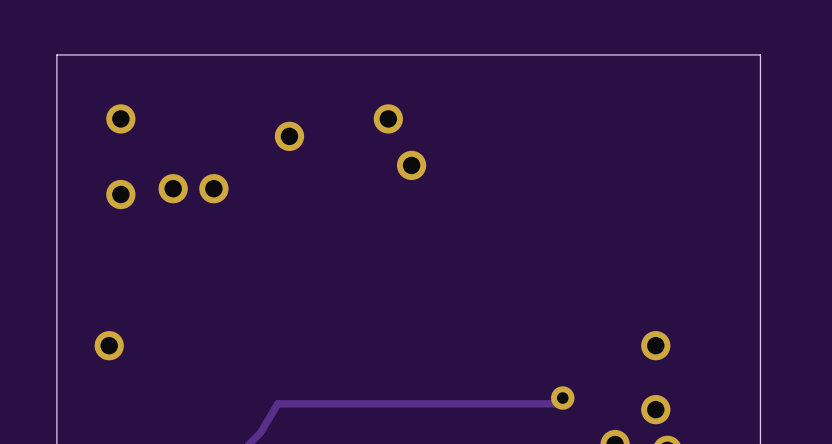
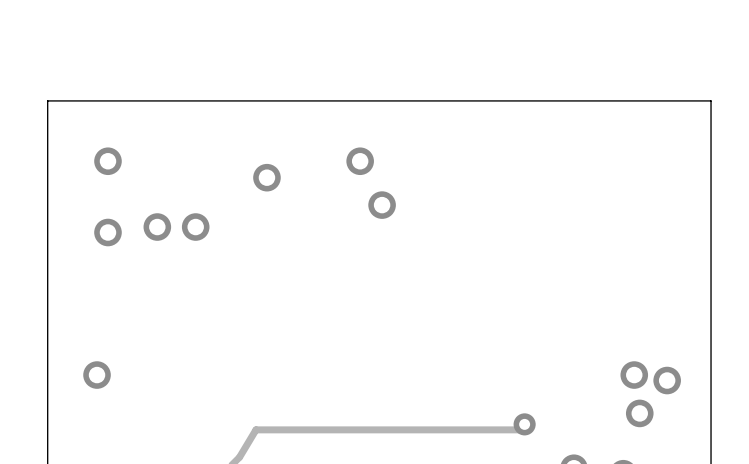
via position: (655, 345) -> (634, 375)
via: none -> (667, 380)
via: none -> (639, 413)
via: (655, 409) -> none

